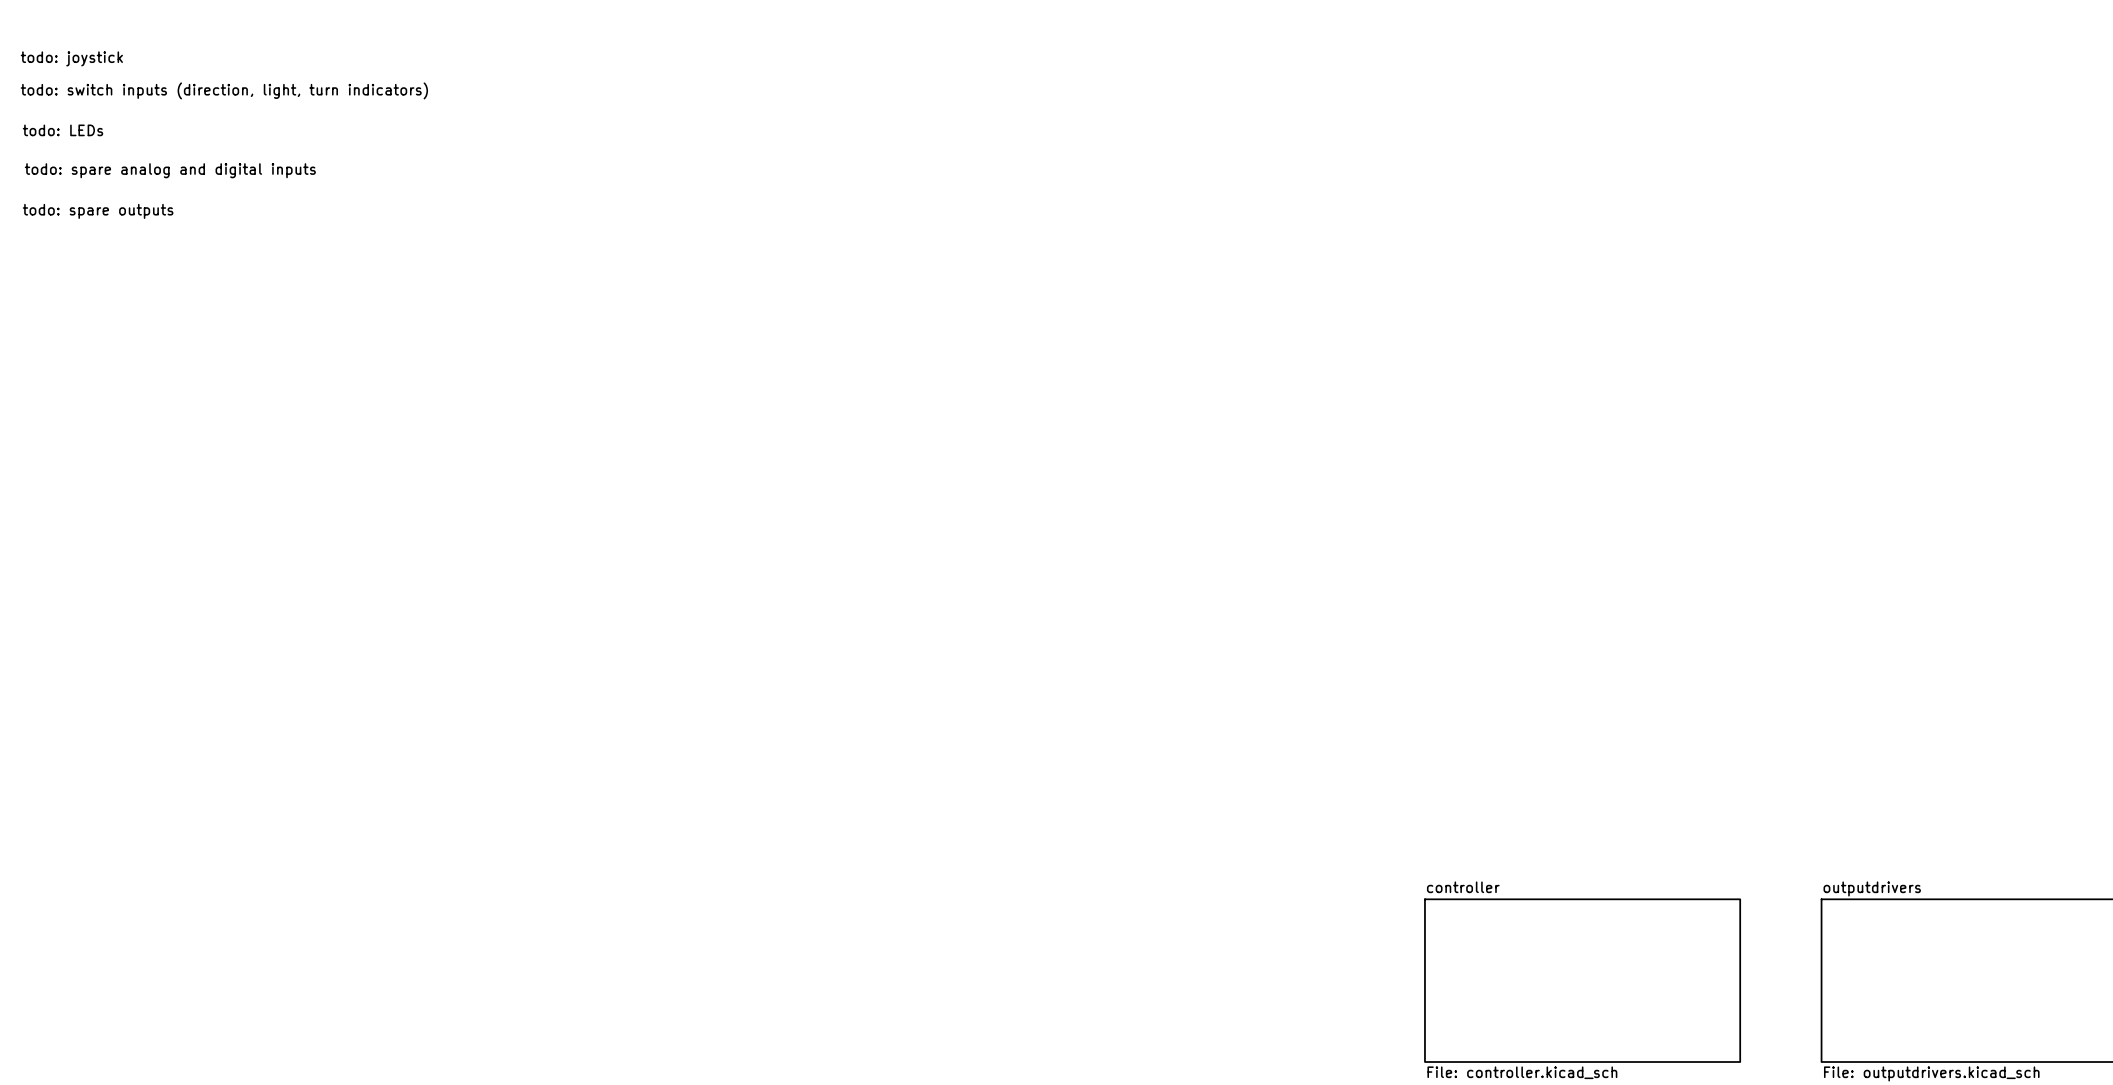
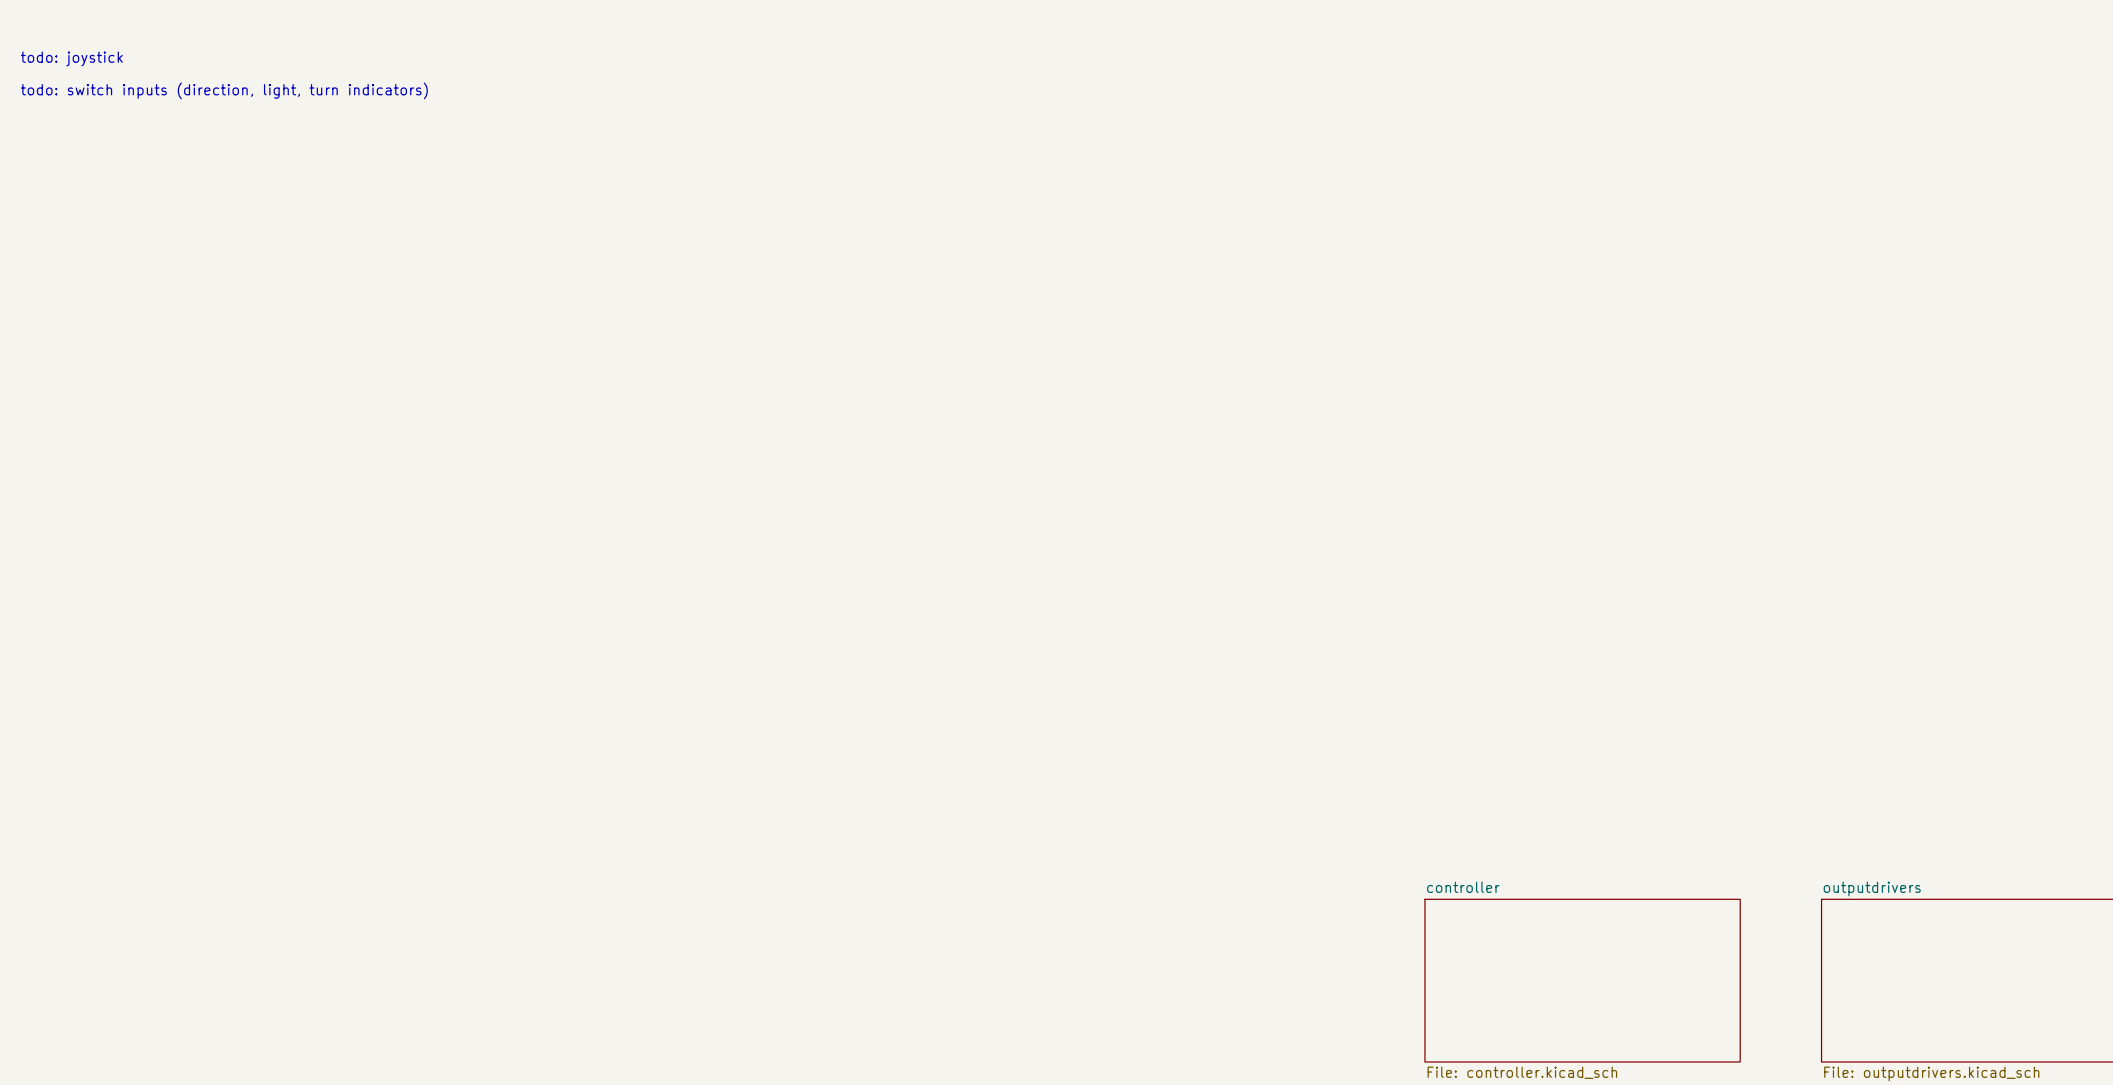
text: todo: LEDs (62, 130) -> none
text: todo: spare analog and digital inputs (170, 170) -> none
text: todo: spare outputs (98, 211) -> none

